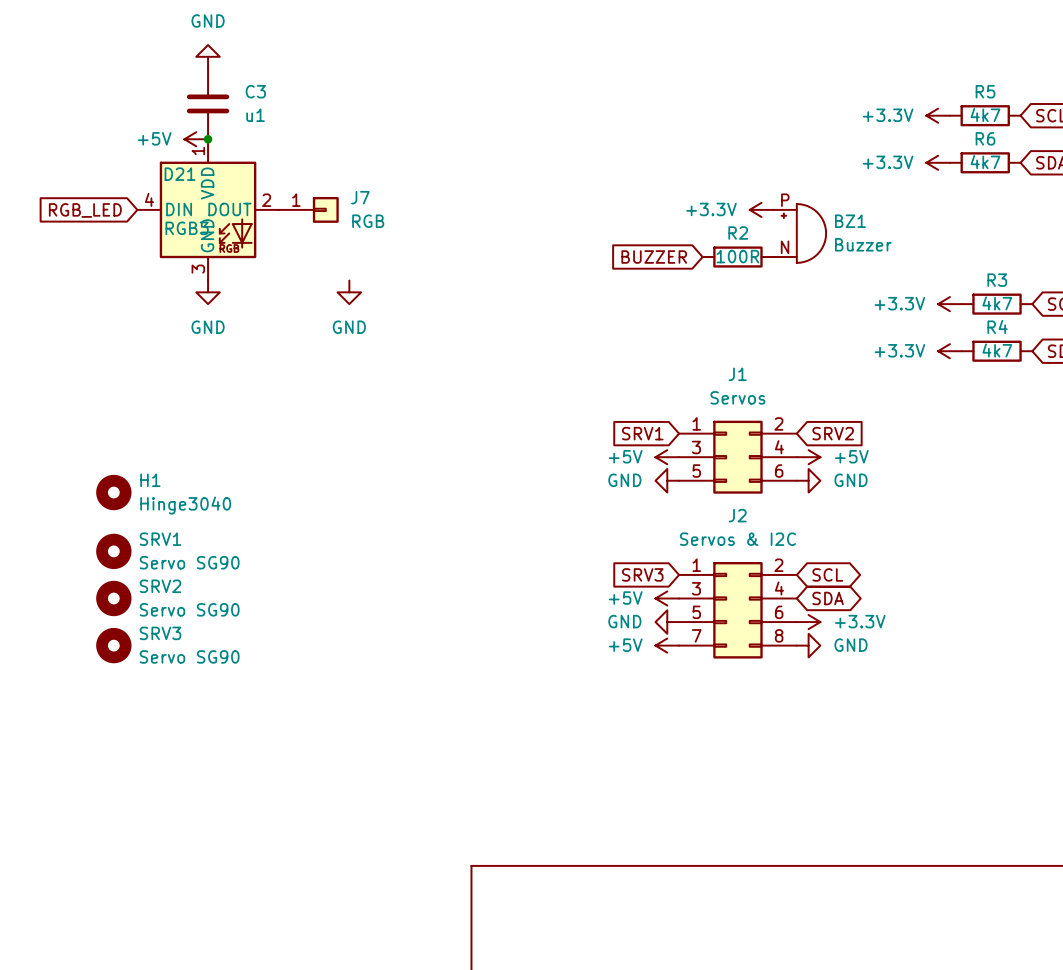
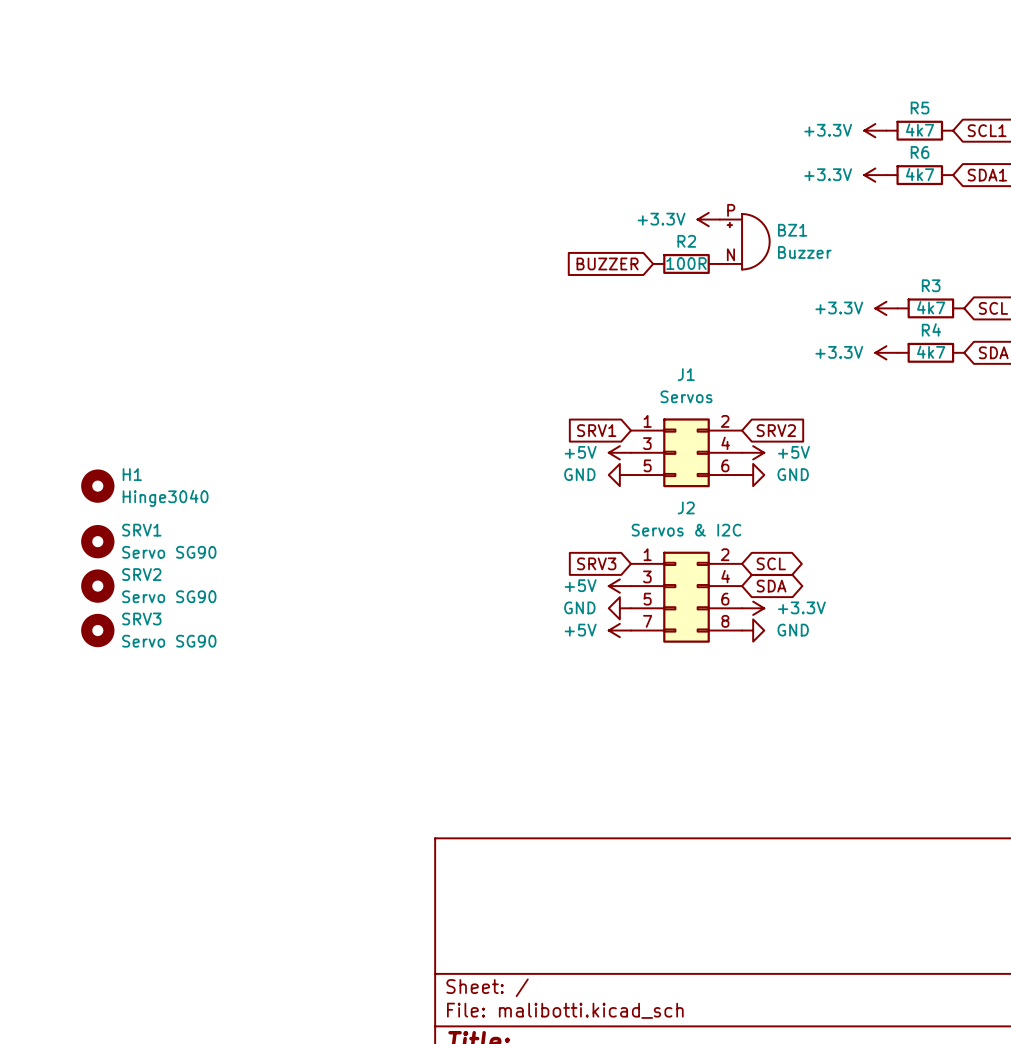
power symbol: GND (208, 56) -> none
C3: u1 (208, 103) -> none
power symbol: +5V (196, 139) -> none
junction: (208, 139) -> none
D21: RGB3 (208, 209) -> none
J7: RGB (308, 209) -> none
global label: RGB_LED (85, 210) -> none
power symbol: GND (208, 292) -> none
power symbol: GND (349, 292) -> none

